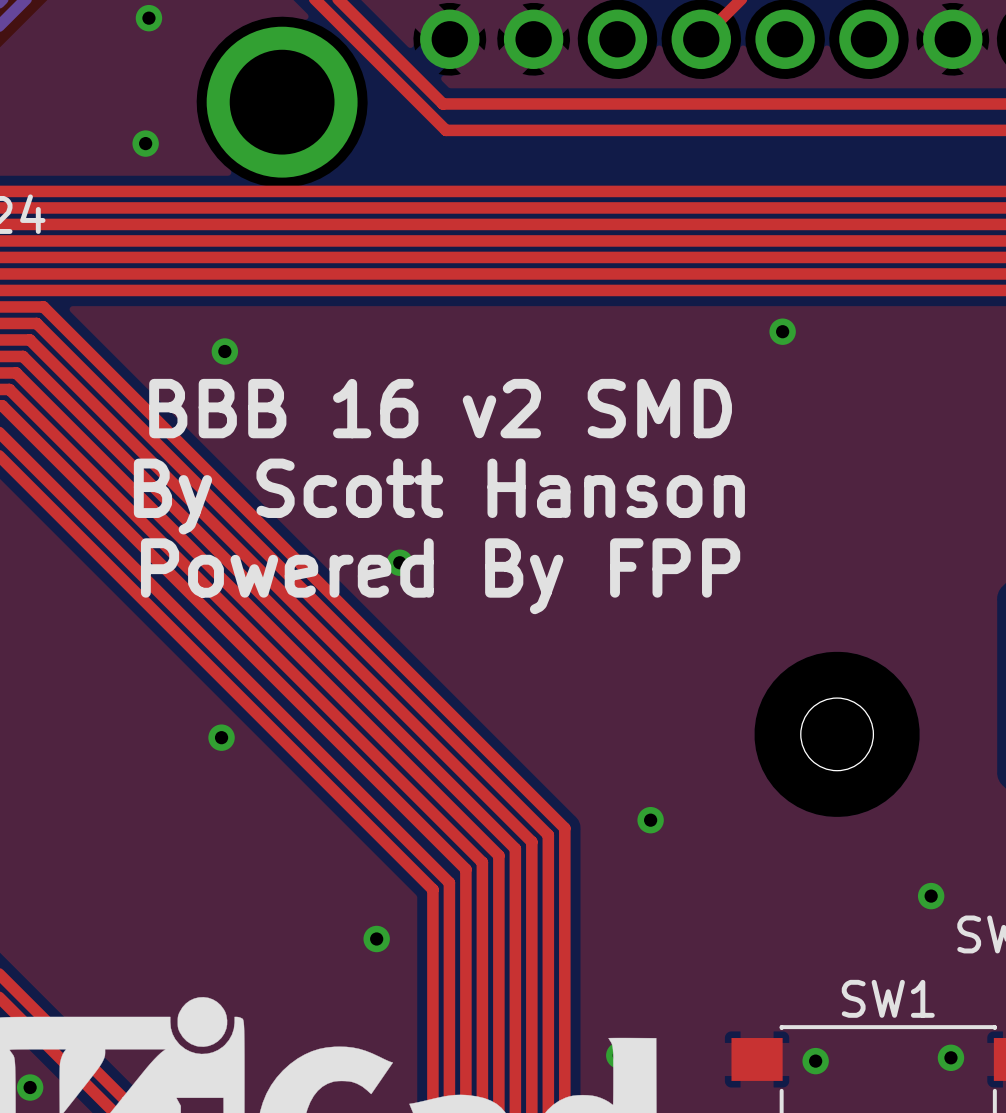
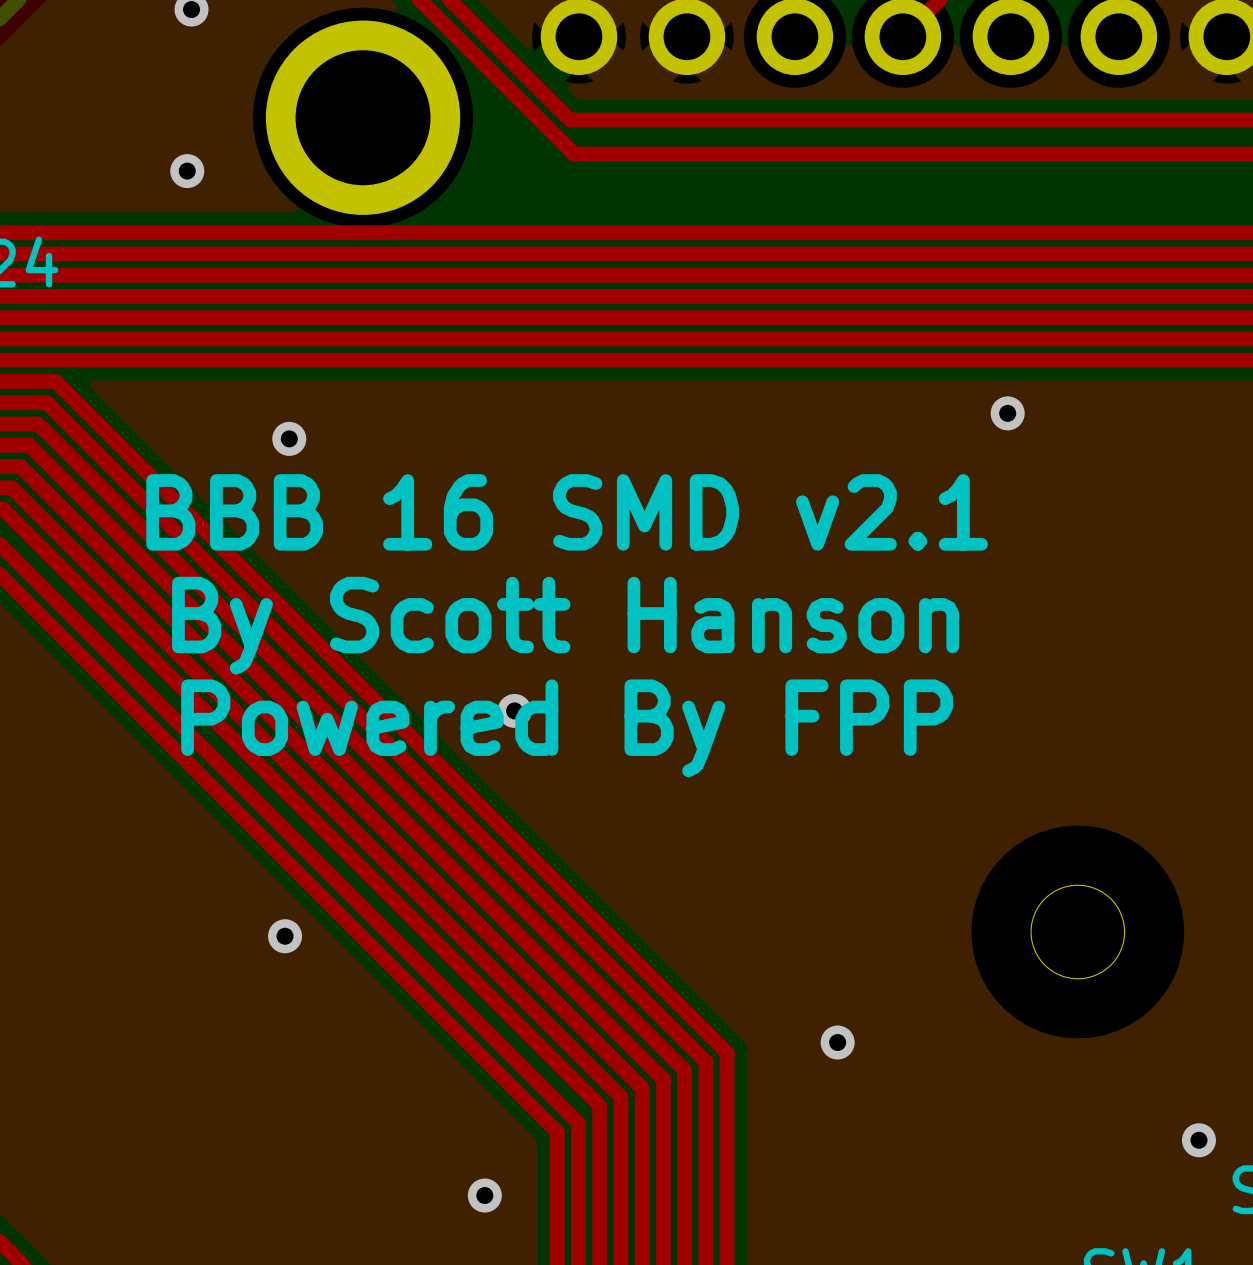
text: BBB 16 v2 SMD (440, 408) -> BBB 16 SMD v2.1 (567, 512)

